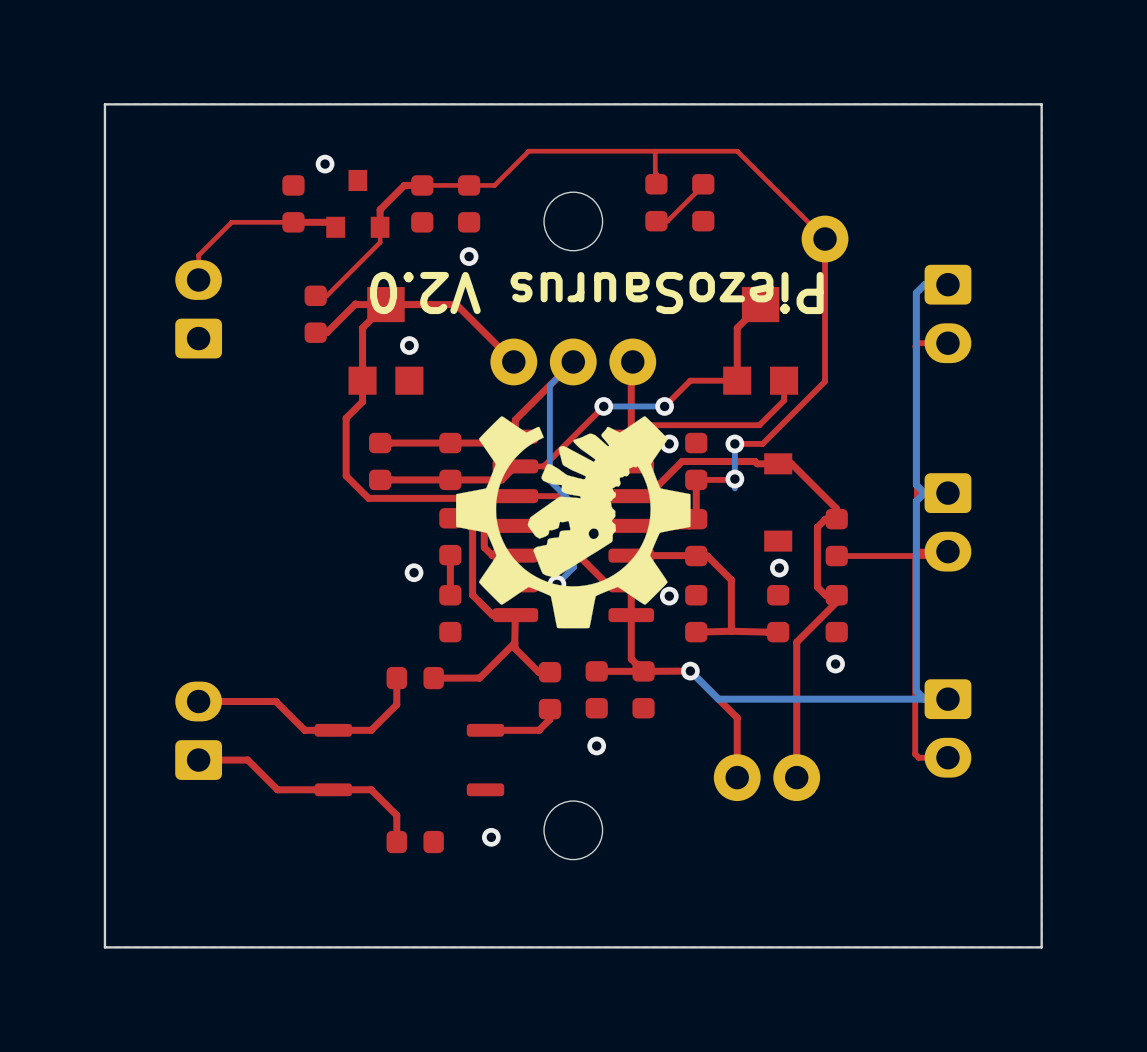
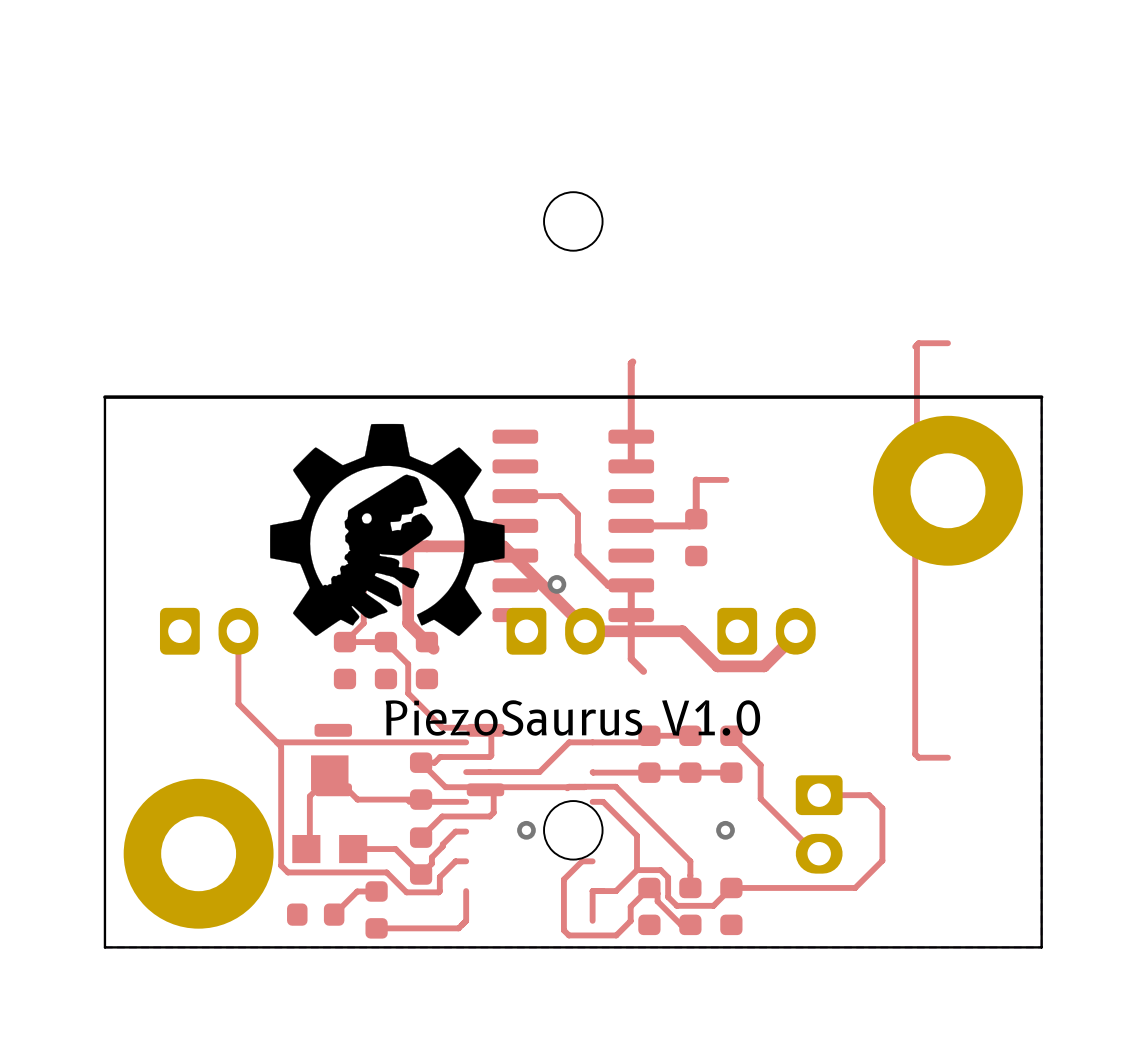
top track: (655, 151) (656, 184) -> none
via: (325, 164) -> none
top track: (703, 184) (667, 221) (656, 221) -> none
part: (656, 202) -> none
part: (703, 202) -> none
part: (293, 203) -> none
part: (357, 203) -> none
part: (422, 203) -> none
part: (469, 203) -> none
top track: (335, 227) (330, 222) (231, 222) (198, 255) (198, 279) -> none
part: (825, 239) -> none
via: (469, 256) -> none
bottom track: (947, 284) (924, 284) (916, 292) (916, 484) (924, 493) -> none
text: PiezoSaurus V2.0 (596, 293) -> none
top track: (315, 295) (326, 295) (380, 242) (380, 209) (404, 185) (494, 185) (528, 151) (737, 151) (825, 239) (825, 381) (762, 443) (734, 443) -> none
top track: (385, 304) (362, 328) (362, 401) (346, 418) (346, 475) (368, 498) (460, 498) (484, 522) (484, 547) (492, 555) (515, 555) -> none
top track: (760, 304) (737, 328) (737, 380) (690, 380) (664, 406) -> none
part: (198, 309) -> none
part: (947, 313) -> none
part: (315, 314) -> none
top track: (315, 332) (326, 332) (355, 304) (456, 304) (513, 361) -> none
part: (385, 340) -> none
part: (760, 340) -> none
via: (409, 345) -> none
part: (513, 361) -> none
top track: (573, 361) (515, 419) (515, 436) (508, 443) (380, 443) -> none
bottom track: (573, 361) (549, 385) (549, 480) (573, 504) (573, 567) (556, 584) -> none
part: (573, 361) -> none
part: (632, 361) -> none
top track: (784, 380) (784, 400) (759, 425) (642, 425) (631, 436) -> none
board edge: (1041, 397) (1041, 104) (104, 104) (104, 397) -> (1041, 397) (104, 397)
top track: (603, 406) (543, 466) (515, 466) (501, 479) (380, 479) -> none
via: (603, 406) -> none
bottom track: (664, 406) (603, 406) -> none
via: (664, 406) -> none
drawing: [455, 416, 691, 629] -> none
drawing: none -> [270, 423, 505, 636]
via: (669, 443) -> none
bottom track: (734, 443) (734, 488) -> none
via: (734, 443) -> none
part: (380, 461) -> none
part: (450, 461) -> none
part: (696, 461) -> none
via: (734, 479) -> none
part: none -> (947, 490)
bottom track: (924, 493) (916, 501) (916, 690) (924, 699) -> none
top track: (631, 496) (647, 496) (682, 461) (754, 461) (757, 463) (791, 463) (836, 508) (836, 519) (825, 519) (817, 527) (817, 587) (825, 595) (836, 595) (836, 602) (796, 642) (796, 777) -> none
part: (778, 502) -> none
top track: (450, 518) (461, 518) (472, 529) (472, 595) (492, 615) (515, 615) (514, 642) -> none
part: (947, 522) -> none
part: (450, 536) -> none
part: (836, 537) -> none
top track: none -> (363, 546) (363, 623) (344, 642) (385, 642) (408, 664) (408, 693) (442, 727) (491, 729) (489, 757) (440, 757) (434, 762) (421, 762) (445, 787) (585, 786)
top track: (918, 551) (947, 551) (943, 556) (836, 556) -> none
top track: (450, 555) (450, 595) -> none
top track: (631, 555) (707, 556) (731, 580) (731, 631) -> none
via: (779, 568) -> none
via: (414, 572) -> none
part footprint: [767, 585, 790, 643] -> [717, 607, 816, 655]
via: (669, 596) -> none
part: (450, 613) -> none
part: (696, 613) -> none
part: (836, 613) -> none
top track: none -> (238, 631) (238, 703) (281, 746) (281, 865) (287, 872) (386, 872) (406, 892) (438, 892) (439, 877) (455, 861) (466, 861)
part: none -> (555, 631)
top track: (731, 631) (778, 632) -> none
top track: (731, 631) (696, 632) -> none
top track: none -> (795, 631) (795, 634) (764, 666) (717, 666) (682, 631) (585, 631) (585, 627) (503, 546) (408, 546) (408, 623) (433, 648)
top track: (514, 642) (479, 678) (433, 678) -> none
top track: (514, 642) (515, 648) (538, 672) (549, 672) -> none
part: none -> (344, 660)
part: none -> (385, 660)
part: none -> (426, 660)
via: (835, 664) -> none
top track: (596, 671) (690, 671) (737, 717) (737, 777) -> none
bottom track: (690, 671) (718, 699) (947, 699) -> none
via: (690, 671) -> none
top track: (396, 678) (396, 704) (371, 730) (304, 730) (275, 701) (198, 701) -> none
part: (415, 678) -> none
part: (596, 689) -> none
part: (643, 689) -> none
part: (549, 690) -> none
top track: (549, 709) (549, 719) (538, 730) (491, 730) -> none
text: none -> PiezoSaurus V1.0 (572, 717)
part position: (947, 728) -> (819, 824)
part rotation: 0° (198, 730) -> 90° clockwise (209, 631)
part position: (198, 730) -> (209, 631)
top track: none -> (690, 735) (649, 735) (642, 742) (569, 742) (539, 772) (466, 772)
top track: none -> (731, 735) (760, 765) (760, 798) (815, 853) (819, 853)
top track: none -> (466, 742) (276, 742)
via: (596, 746) -> none
part: none -> (649, 754)
part: none -> (690, 754)
part: none -> (731, 754)
top track: (198, 760) (247, 760) (277, 789) (371, 789) (396, 815) (396, 842) -> none
top track: none -> (329, 772) (357, 799) (466, 801)
top track: none -> (334, 772) (309, 796) (309, 849)
top track: none -> (592, 772) (731, 772)
part: (737, 777) -> none
part: (796, 777) -> none
part: none -> (421, 781)
top track: none -> (493, 787) (493, 812) (489, 816) (442, 816) (421, 837)
top track: none -> (567, 788) (615, 786) (690, 861) (690, 887)
top track: none -> (819, 795) (869, 795) (882, 808) (882, 860) (855, 887) (731, 887) (713, 905) (676, 905) (668, 897) (668, 877) (660, 870) (636, 870)
top track: none -> (592, 801) (603, 801) (636, 835) (636, 870)
part: none -> (329, 809)
via: none -> (725, 830)
top track: none -> (466, 831) (455, 831) (431, 857) (431, 863) (421, 874) (395, 849) (353, 849)
via position: (491, 837) -> (526, 830)
part rotation: 0° (415, 842) -> 90° clockwise (421, 856)
part: none -> (198, 853)
top track: none -> (592, 861) (582, 861) (563, 879) (563, 930) (568, 935) (616, 935) (630, 921) (630, 906) (649, 887) (657, 893) (657, 901) (681, 924) (690, 924)
top track: none -> (636, 870) (616, 891) (592, 891) (592, 920)
top track: none -> (376, 891) (357, 891) (334, 914)
top track: none -> (466, 891) (466, 920) (458, 928) (376, 928)
part: none -> (649, 906)
part: none -> (690, 906)
part: none -> (731, 906)
part: none -> (376, 909)
part: none -> (315, 914)

